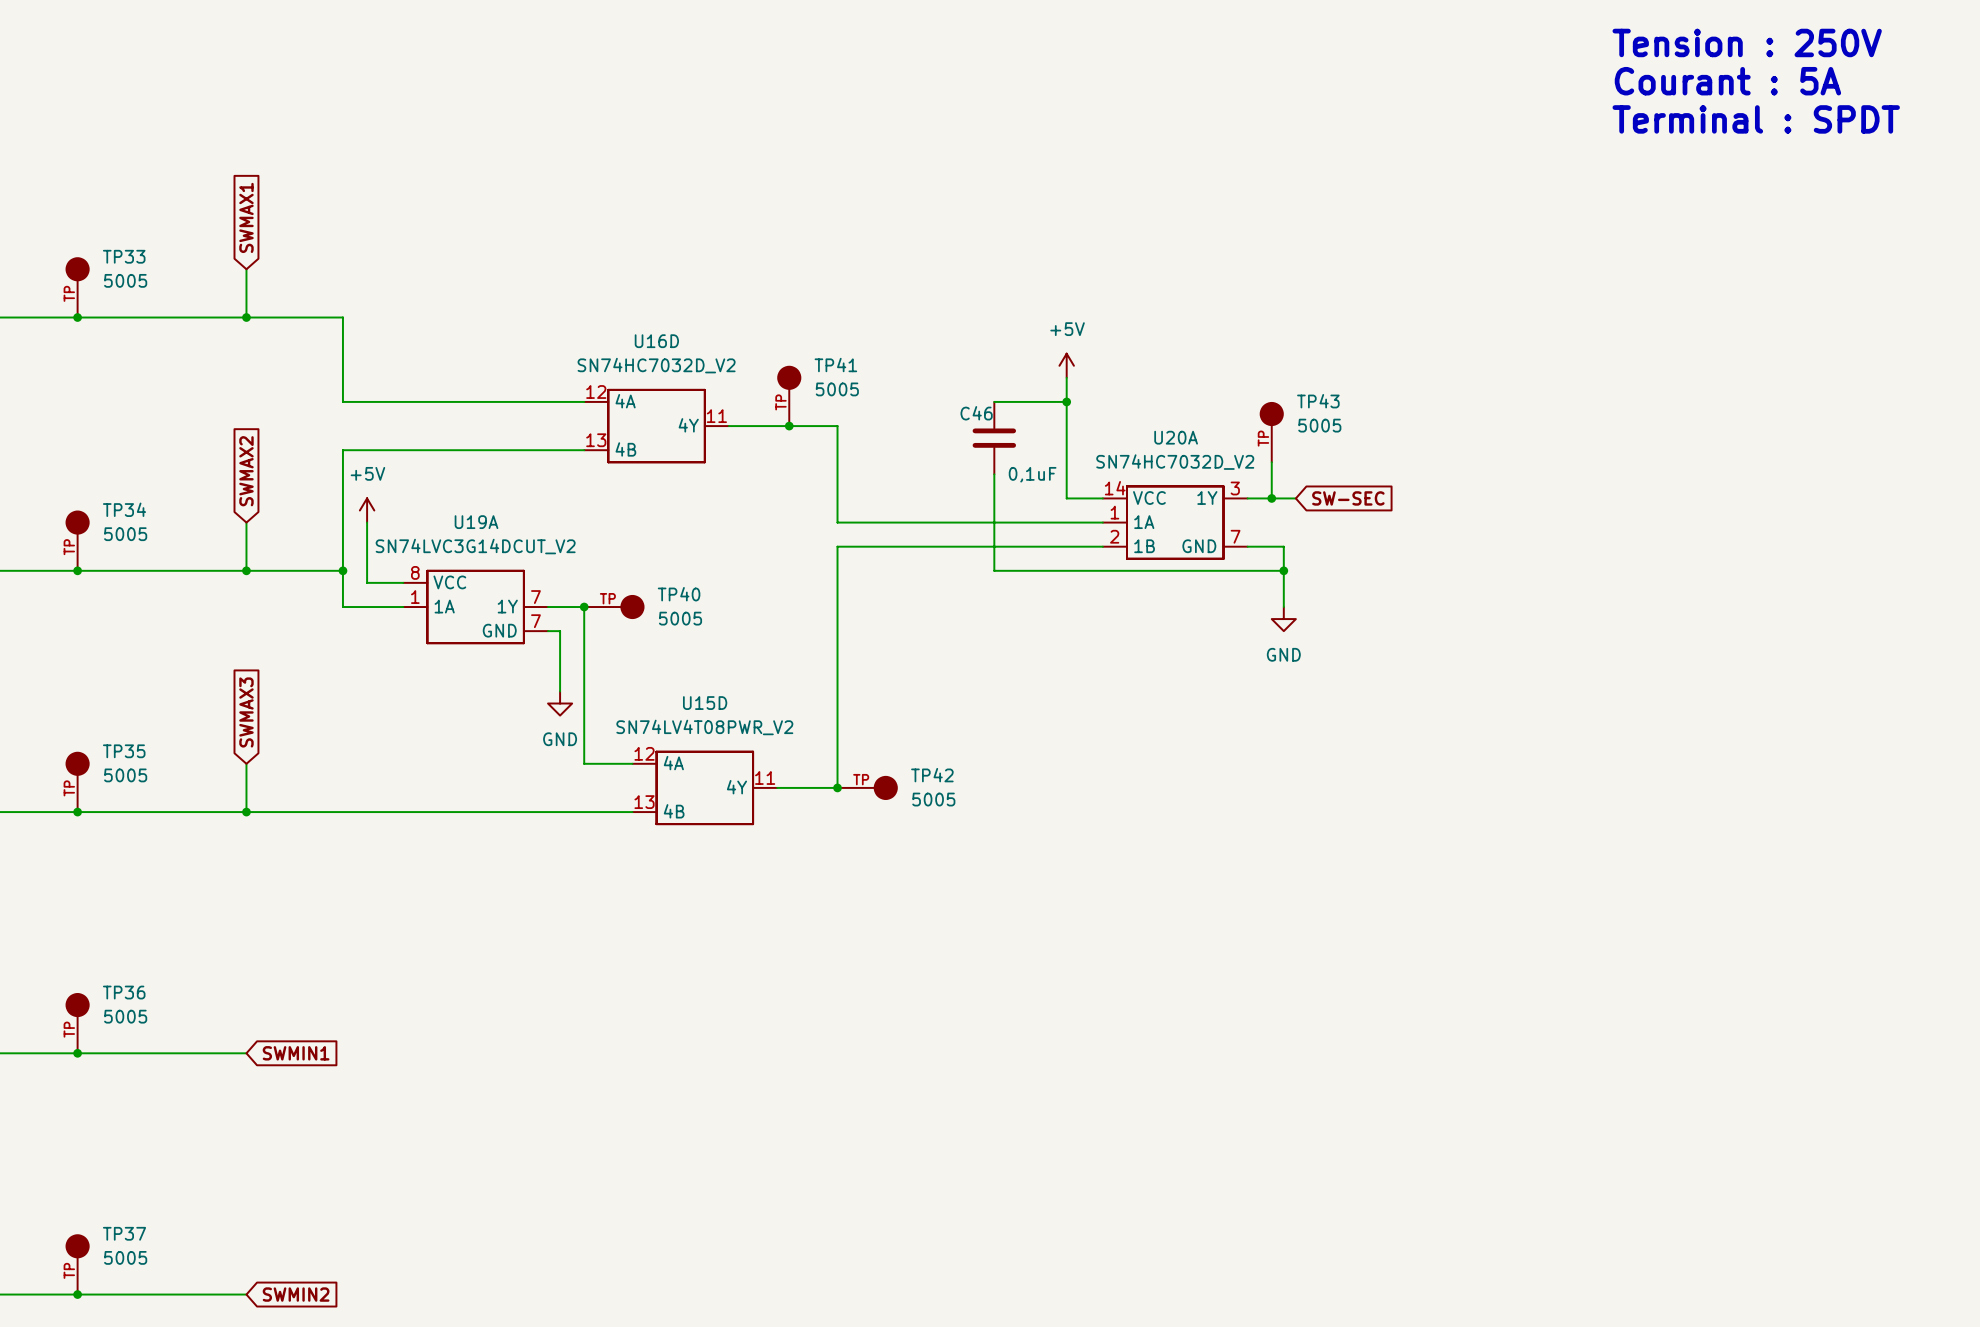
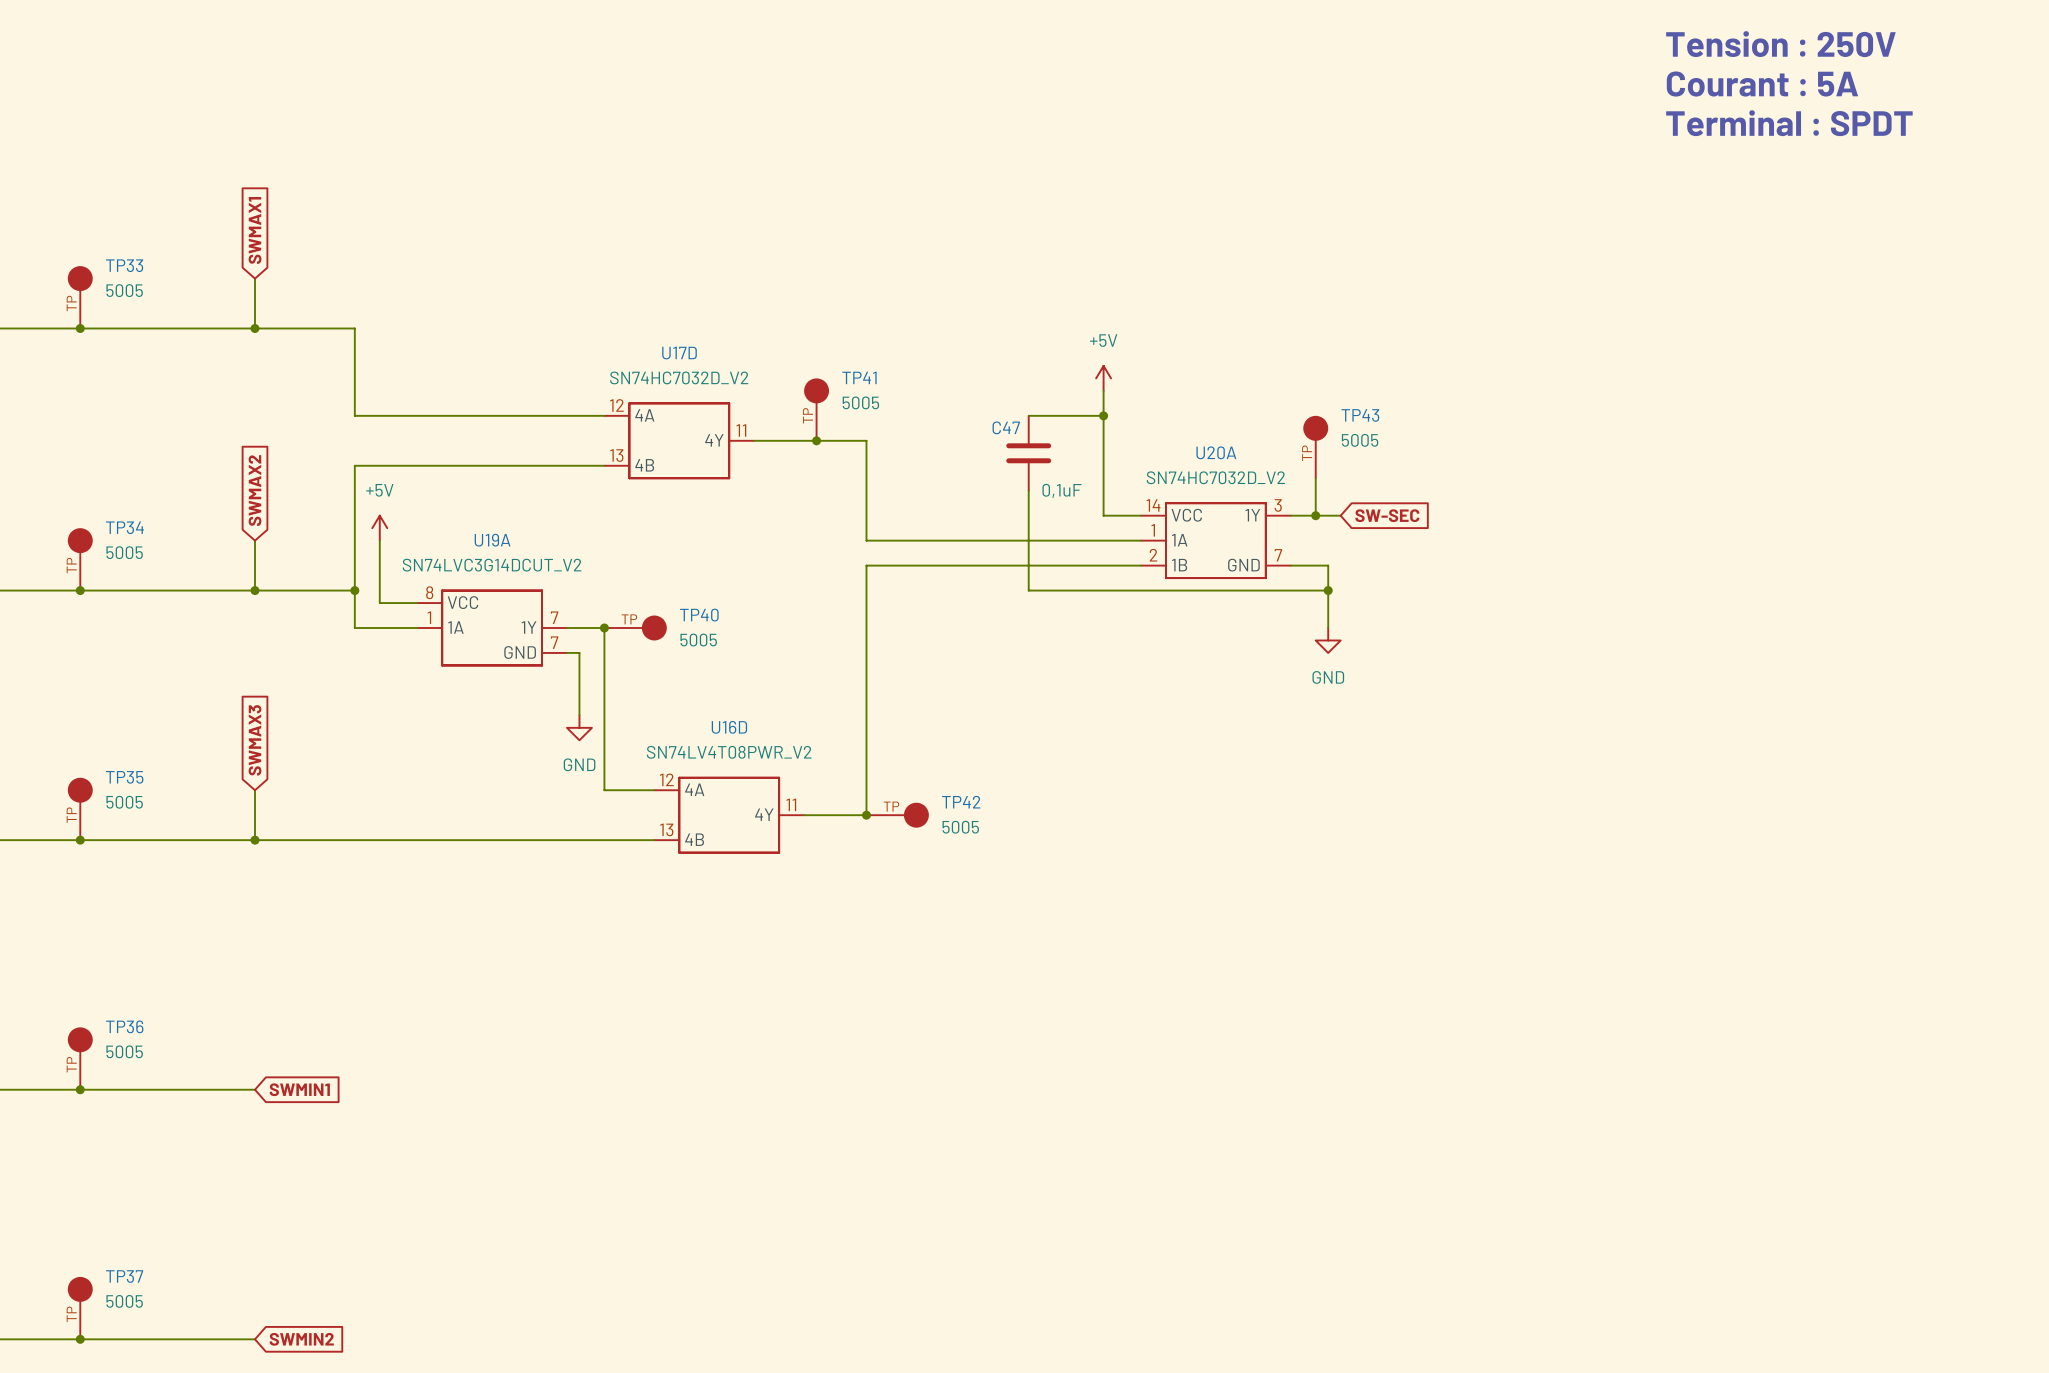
U16D name: U16D (656, 341) -> U17D (679, 353)
C46 name: C46 (976, 413) -> C47 (1006, 427)
U15D name: U15D (705, 703) -> U16D (729, 727)

